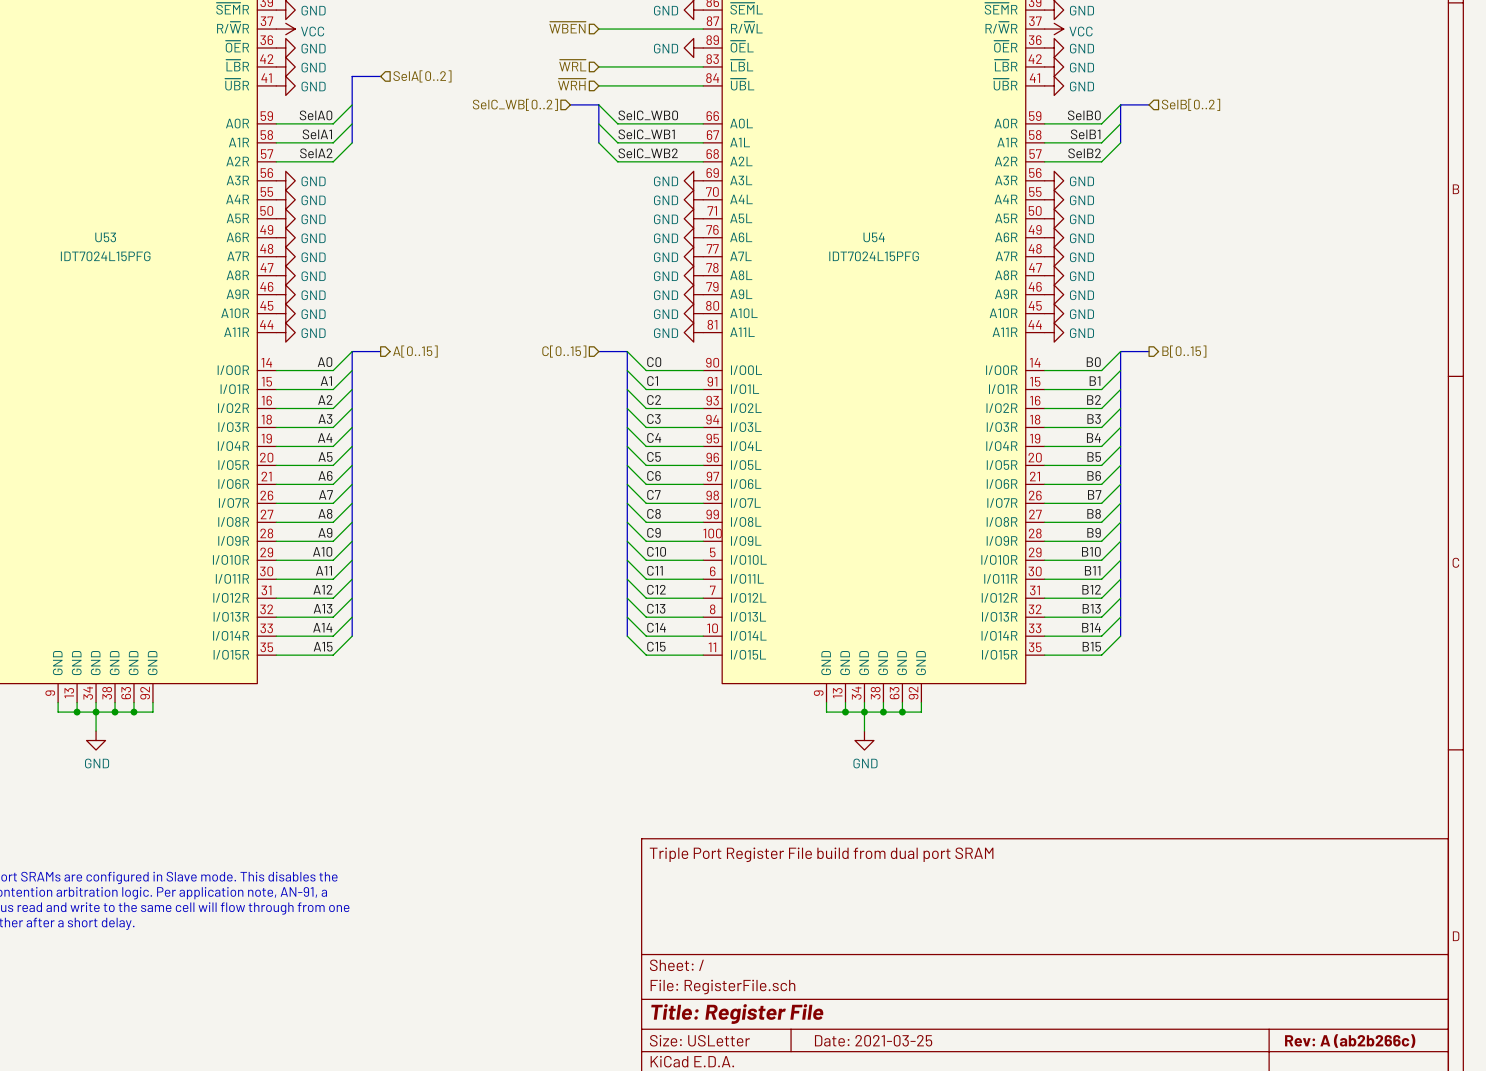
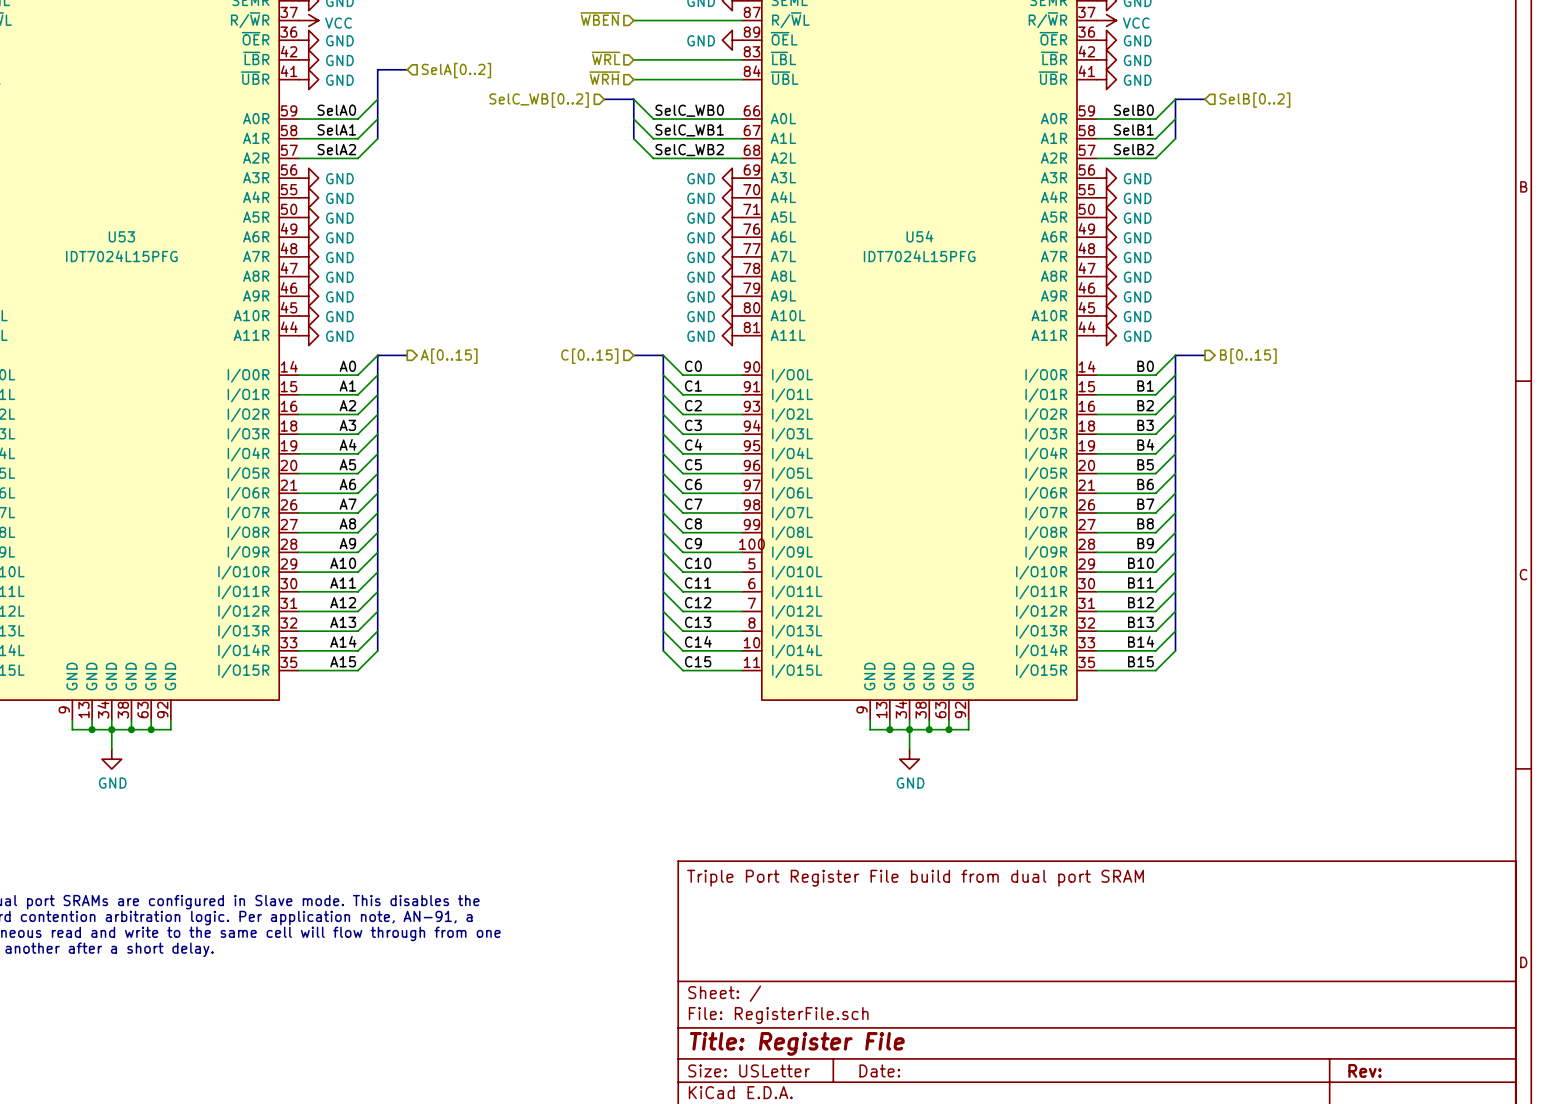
title block: Date: 2021-03-25 (873, 1040) -> Date: (879, 1070)
title block: Rev: A (ab2b266c) (1350, 1041) -> Rev: (1364, 1070)

